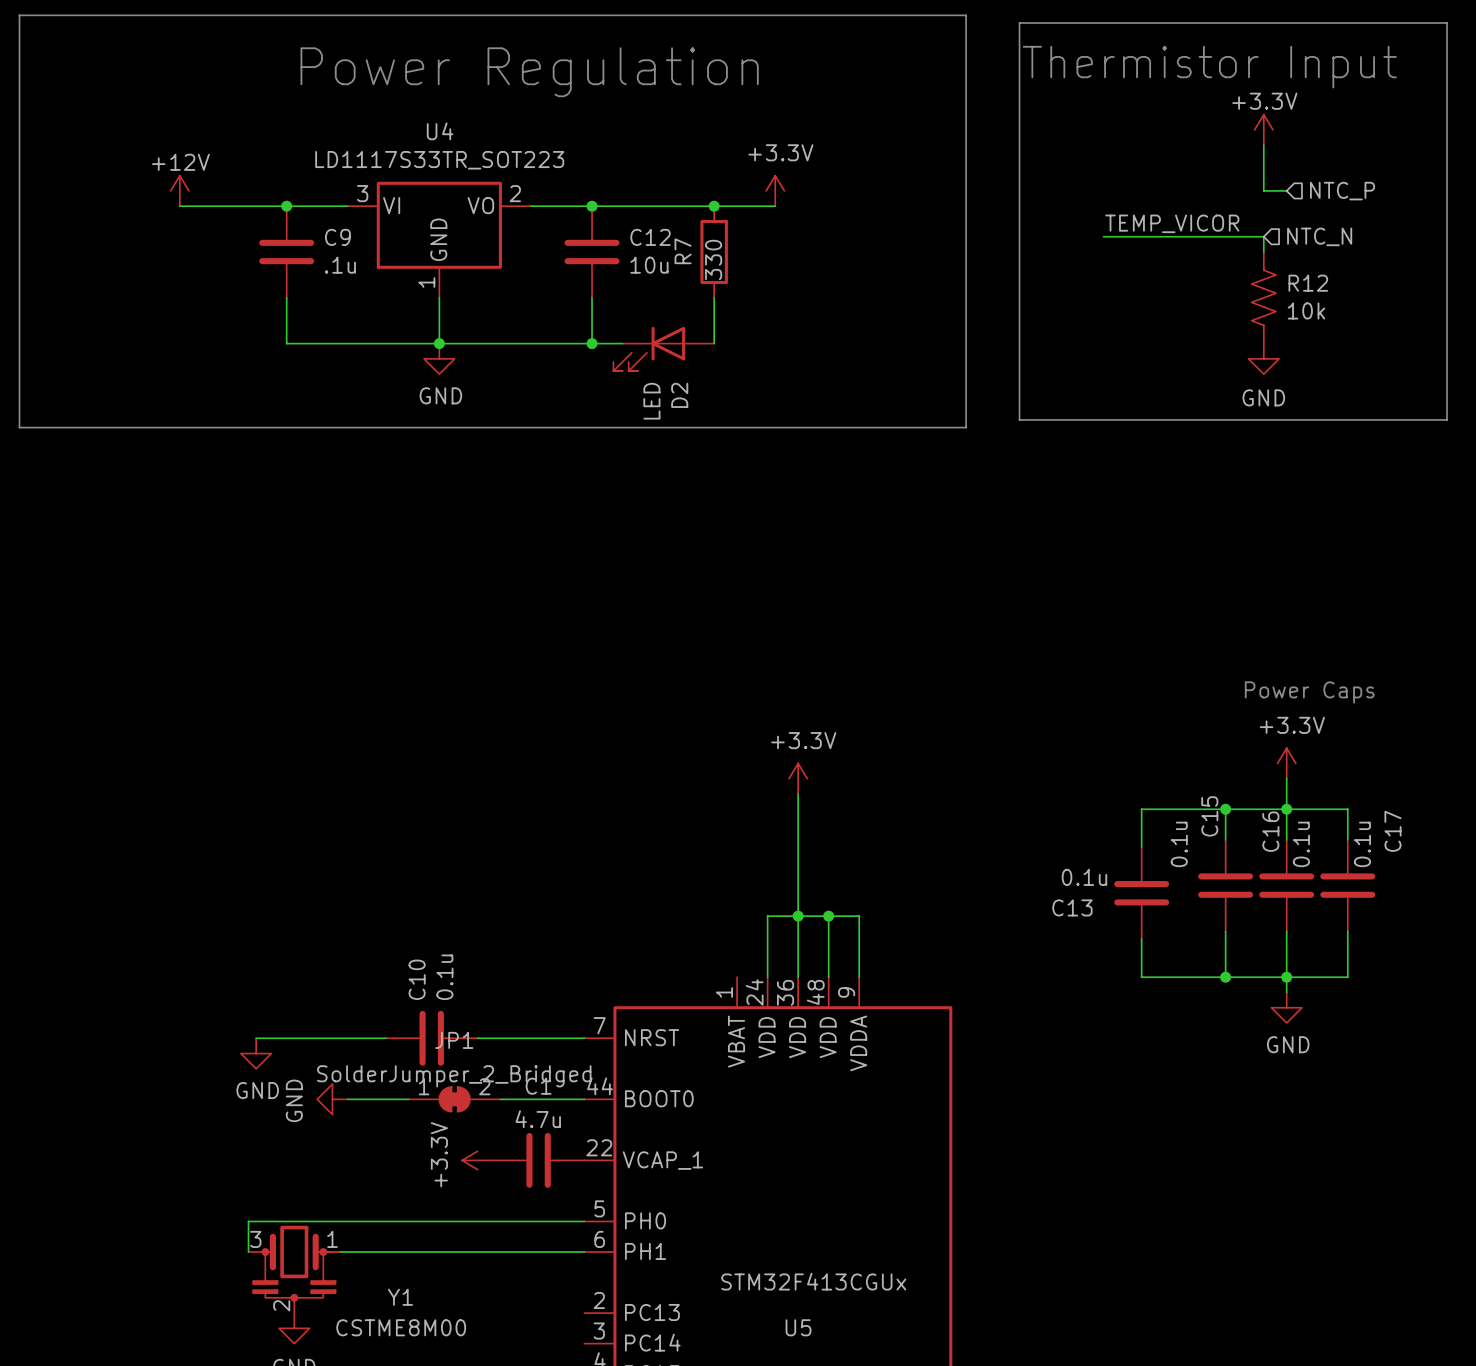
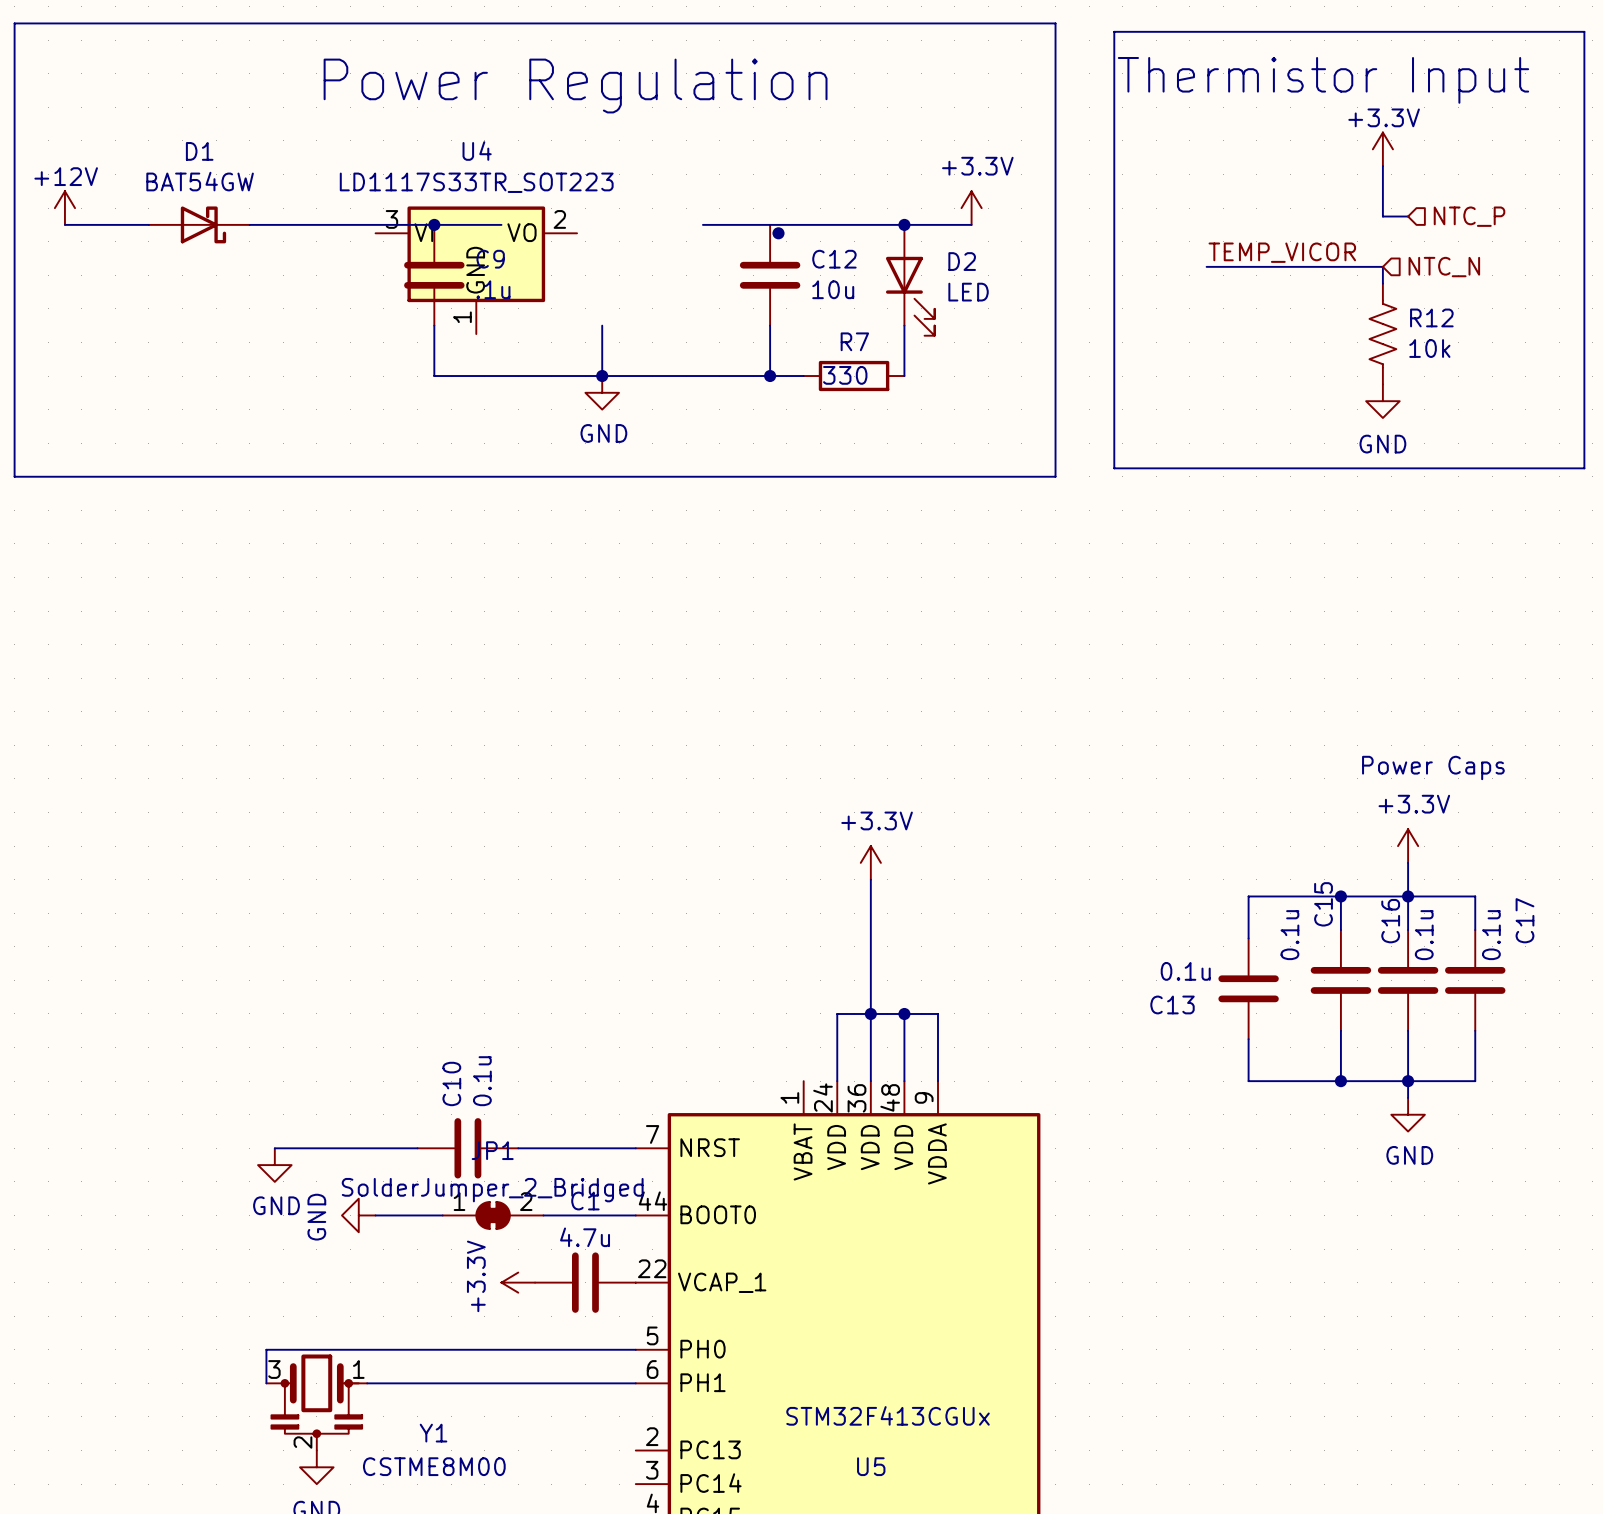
power symbol position: +12V (179, 190) -> +12V (64, 208)
power symbol position: +3.3V (775, 190) -> +3.3V (971, 208)
wire: none -> (64, 224) (148, 224)
D1: none -> BAT54GW (199, 224)
wire: none -> (249, 224) (501, 224)
junction: none -> (434, 224)
junction: none -> (904, 224)
wire: (179, 206) (347, 206) -> none
junction: (286, 206) -> none
wire: (530, 206) (775, 206) -> (702, 224) (971, 224)
junction: (592, 206) -> none
C9 position: (286, 252) -> (434, 275)
C12 position: (592, 252) -> (770, 275)
R7 rotation: 0° (714, 252) -> 90° clockwise (854, 376)
R7 position: (714, 252) -> (854, 376)
wire: (286, 297) (286, 343) (622, 343) -> (434, 325) (434, 376) (803, 376)
wire: (439, 297) (439, 343) -> (602, 325) (602, 376)
wire: (592, 297) (592, 343) -> (770, 325) (770, 376)
wire: (714, 297) (714, 343) -> (904, 325) (904, 376)
junction: none -> (770, 376)
junction: (439, 343) -> none
junction position: (592, 343) -> (602, 376)
D2 rotation: 0° (649, 348) -> 90° counterclockwise (910, 296)
D2 position: (663, 348) -> (910, 280)
power symbol position: GND (439, 358) -> GND (602, 392)

